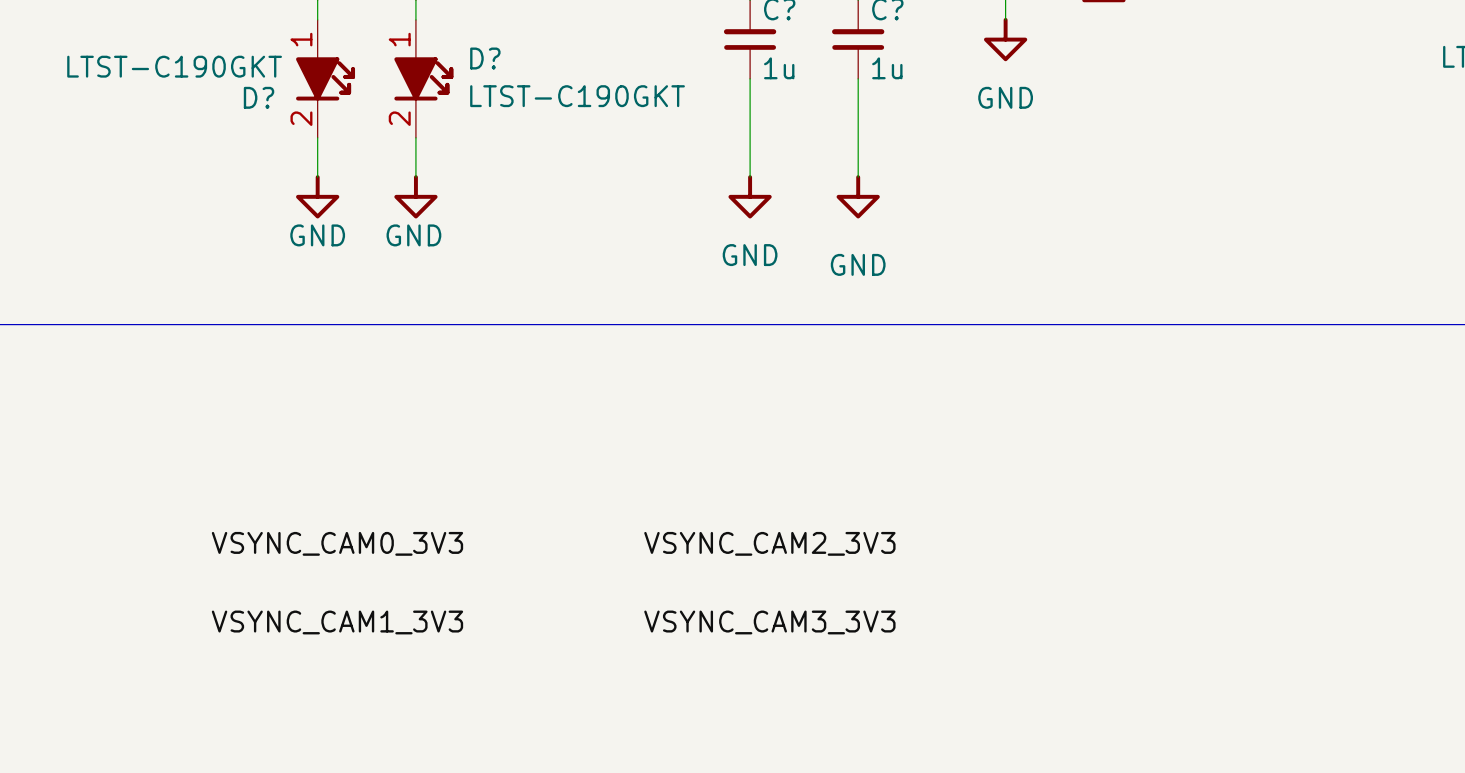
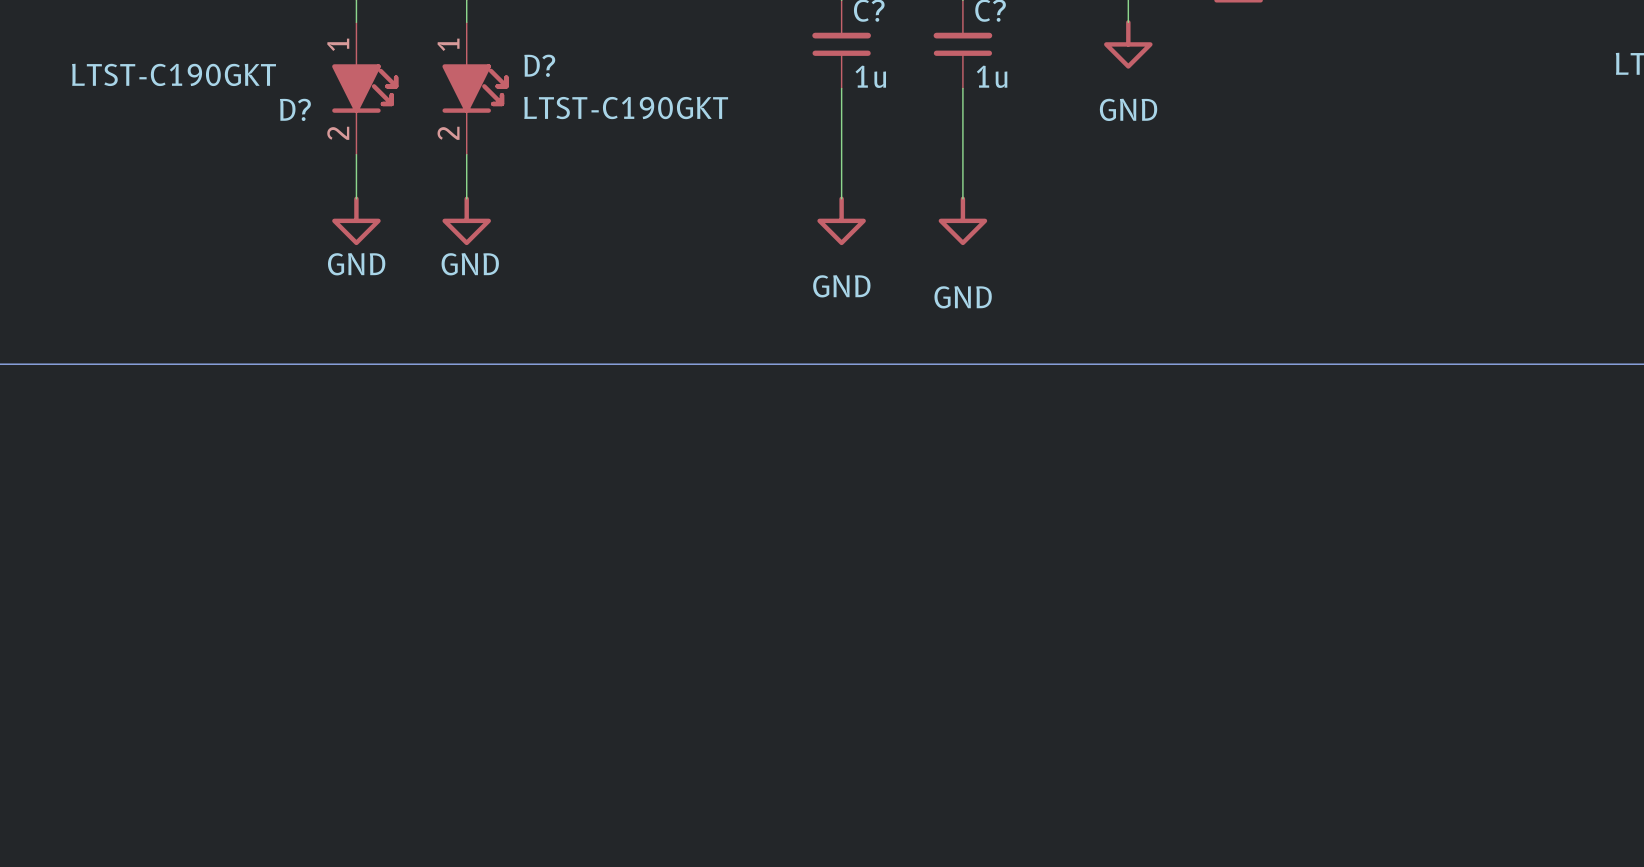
label: VSYNC_CAM0_3V3 (337, 543) -> none
label: VSYNC_CAM2_3V3 (769, 543) -> none
label: VSYNC_CAM1_3V3 (337, 622) -> none
label: VSYNC_CAM3_3V3 (769, 622) -> none

